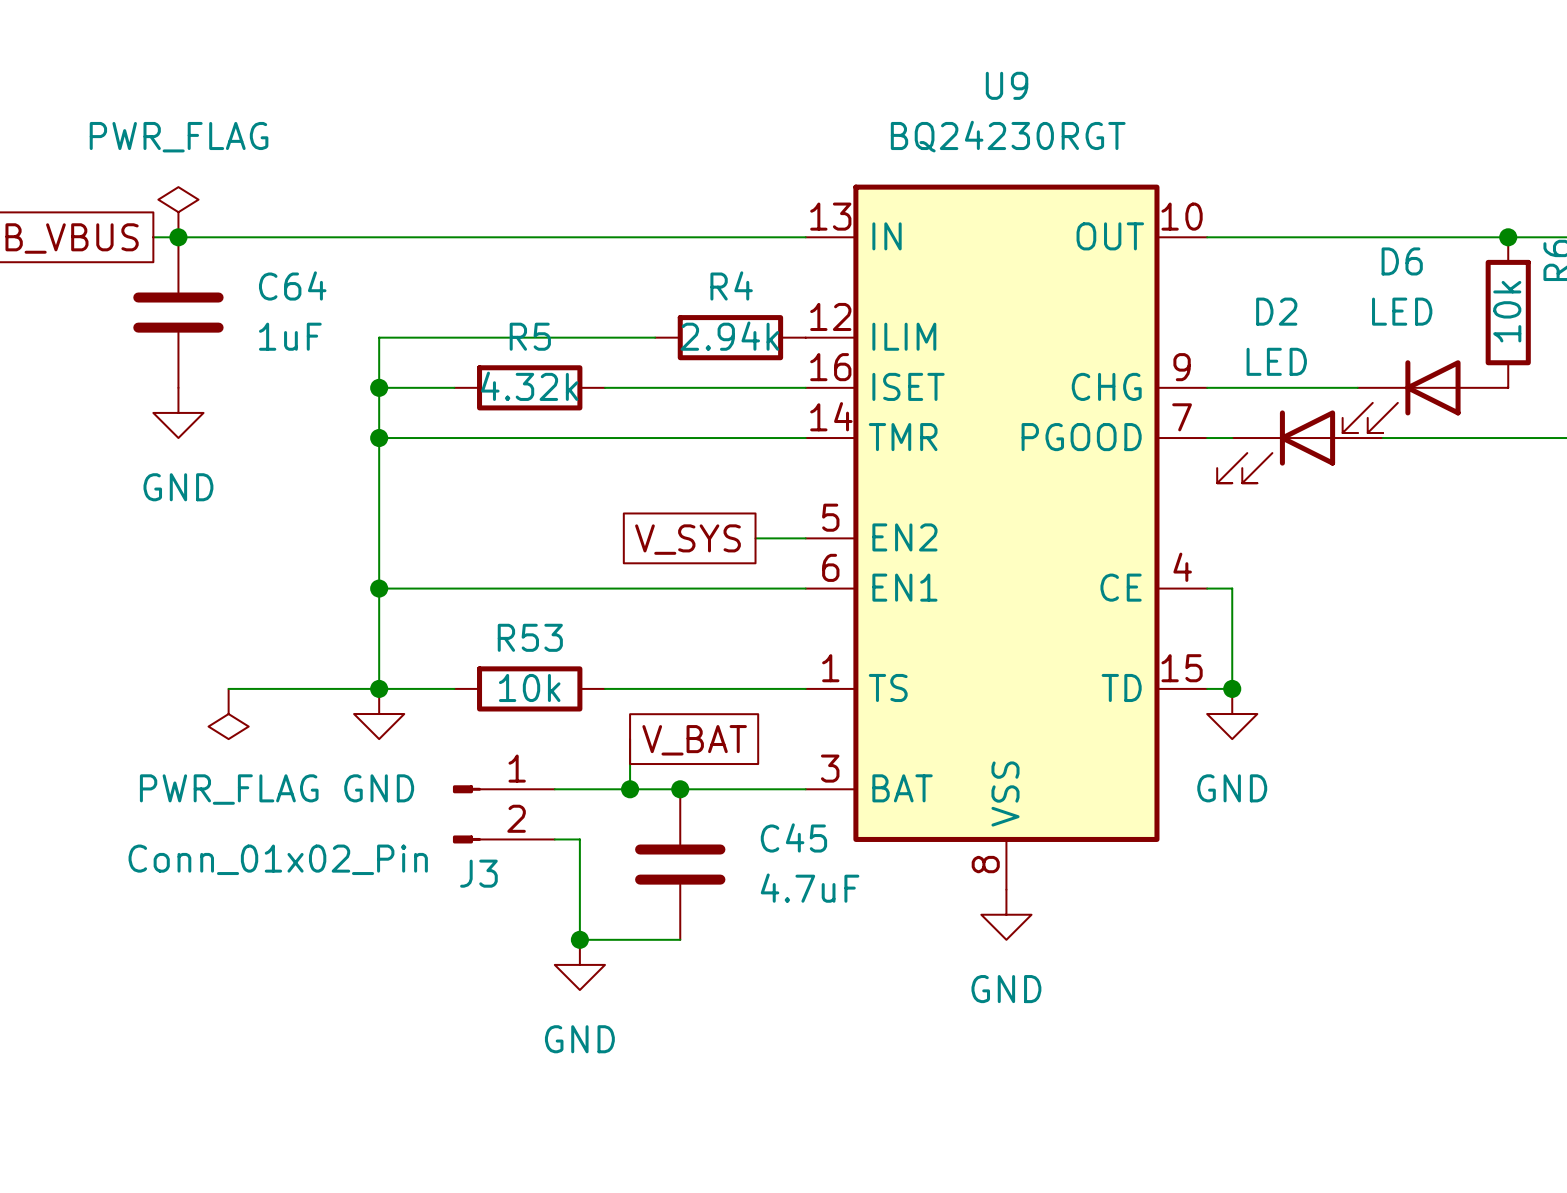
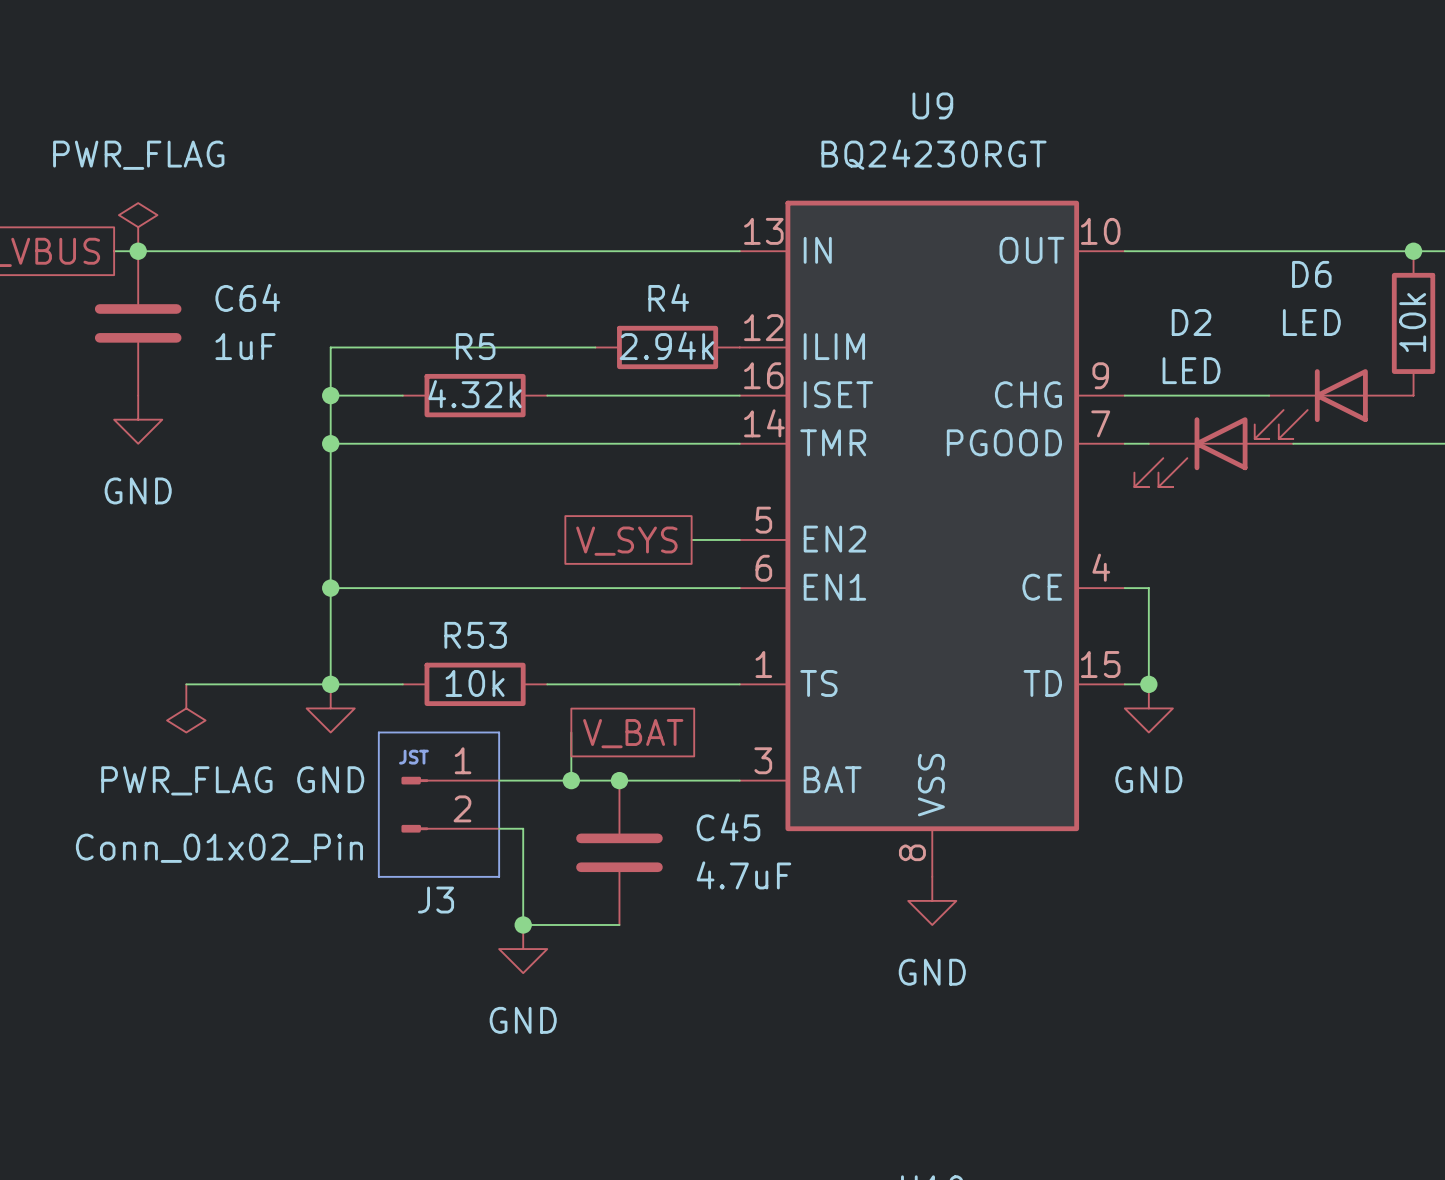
line: none -> (378, 732) (499, 732) (499, 876) (378, 876) (378, 732)
text: none -> JST (413, 757)
J3 value position: Conn_01x02_Pin (278, 859) -> Conn_01x02_Pin (219, 848)
J3 name position: J3 (478, 873) -> J3 (436, 900)

